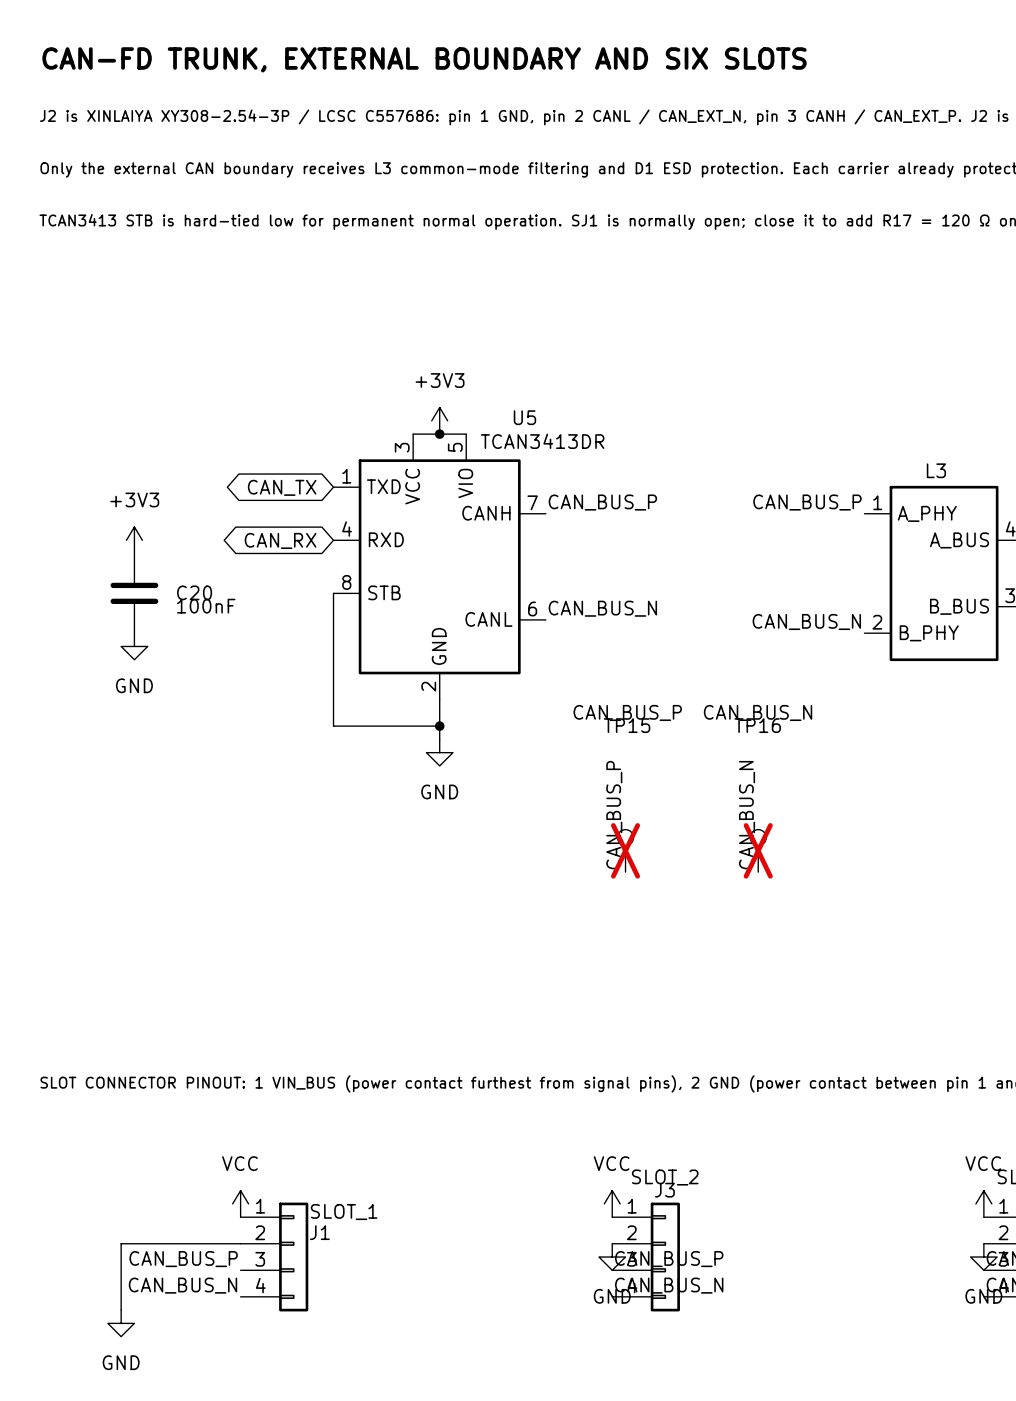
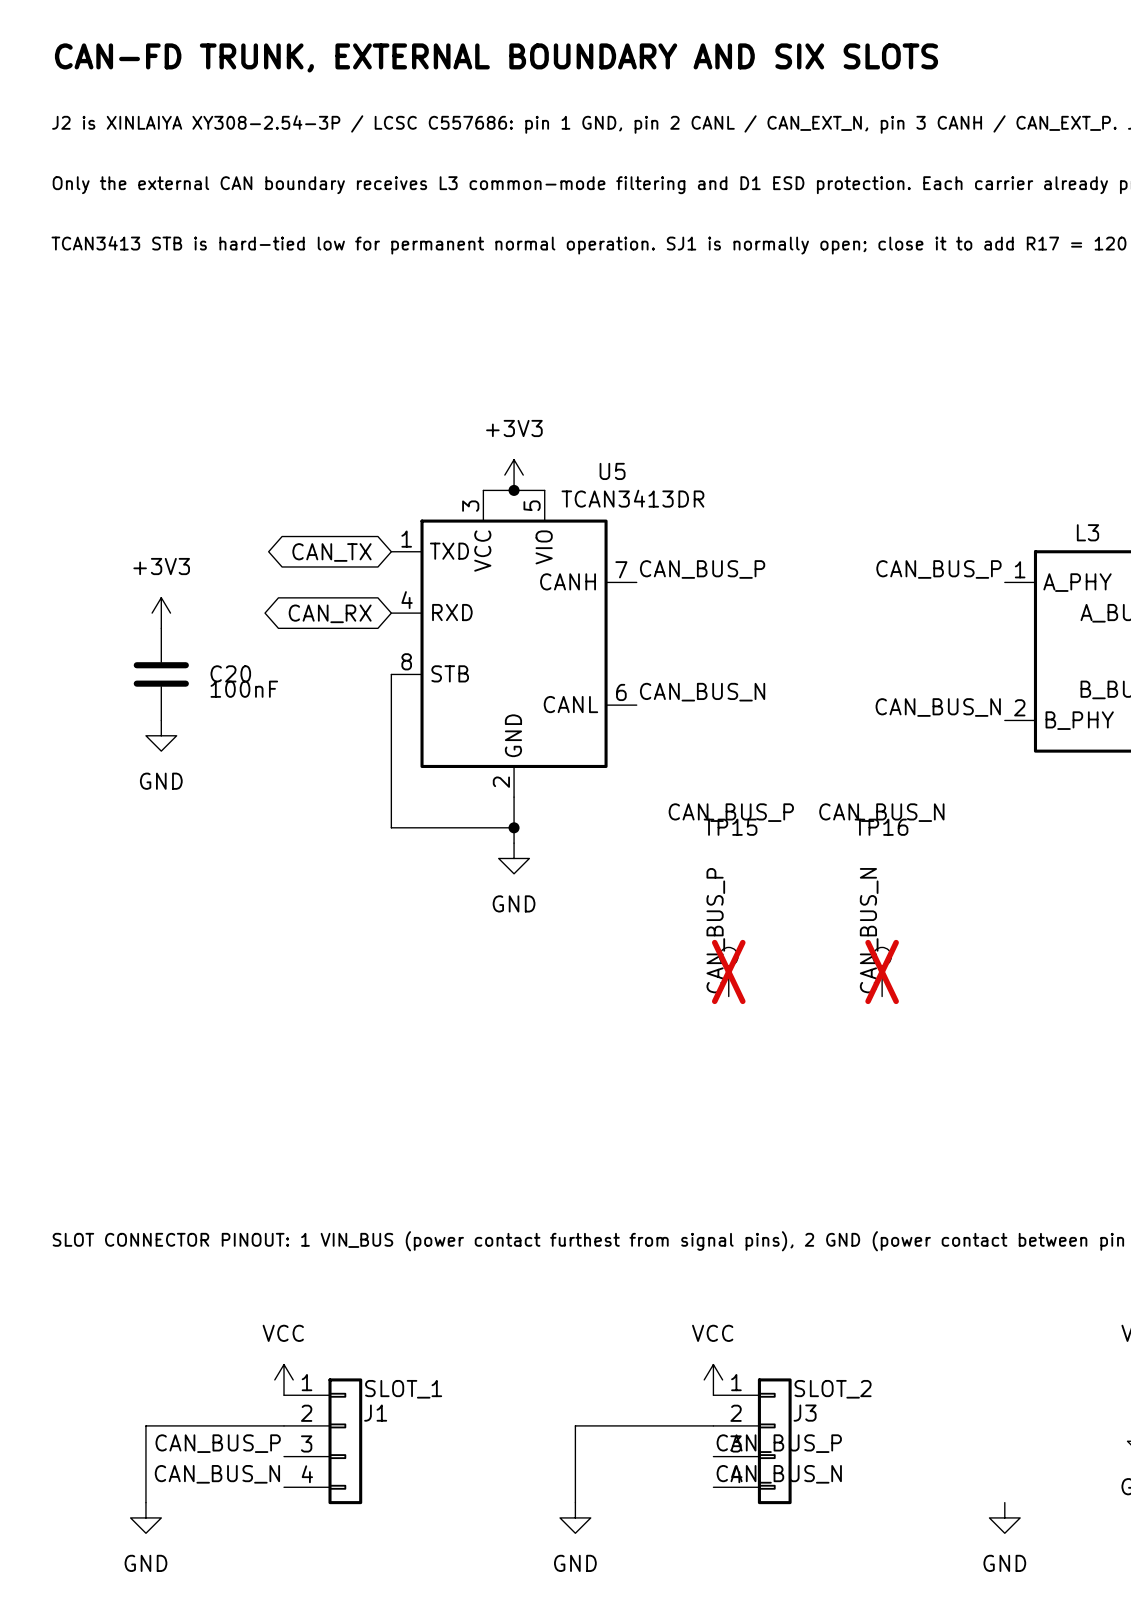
J3 value position: SLOT_2 (665, 1177) -> SLOT_2 (833, 1389)
J3 name position: J3 (664, 1190) -> J3 (805, 1413)
wire: none -> (713, 1425) (575, 1425) (575, 1502)
power symbol: GND (612, 1257) -> none
power symbol: none -> GND (575, 1517)
power symbol: none -> GND (1004, 1517)

